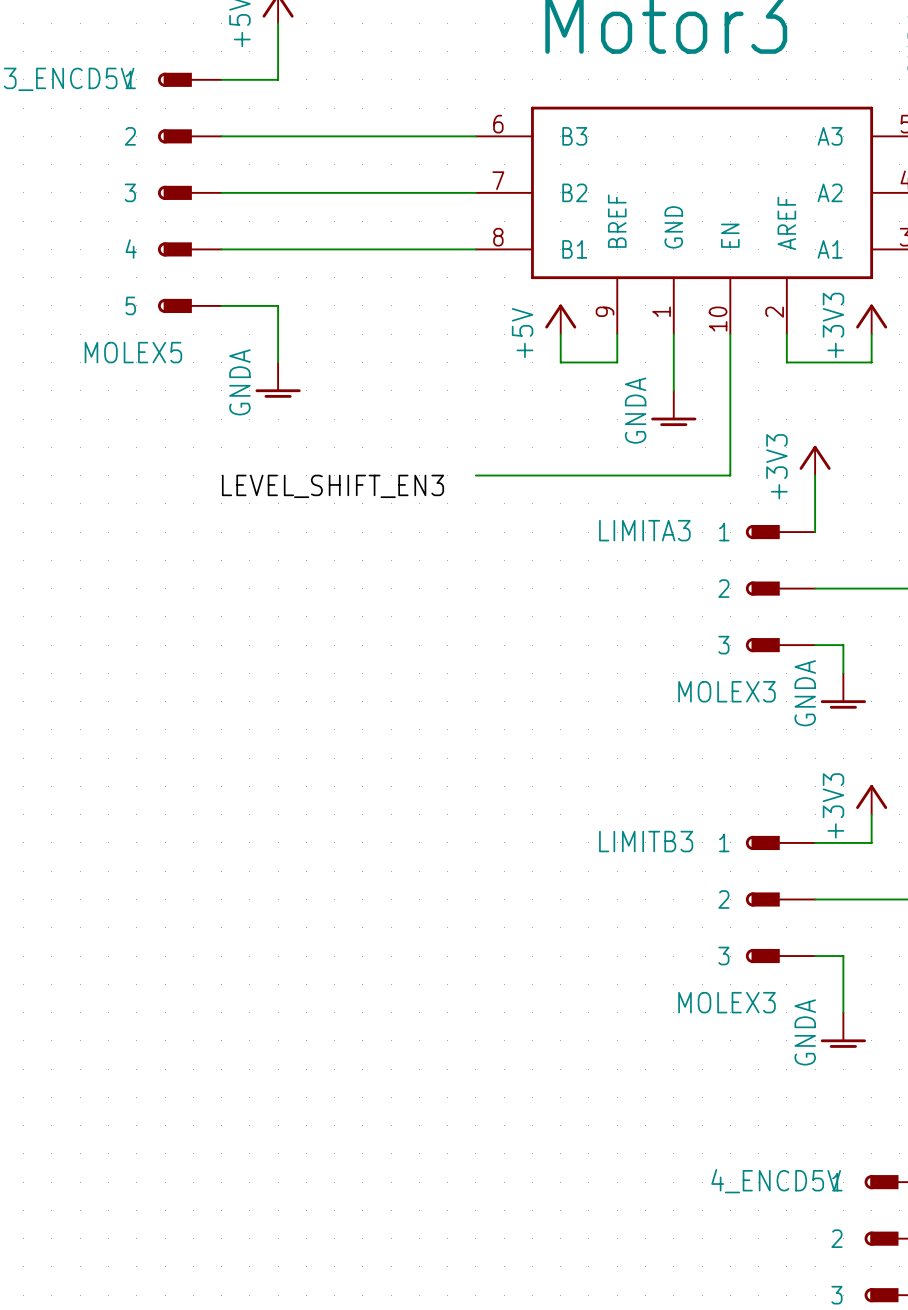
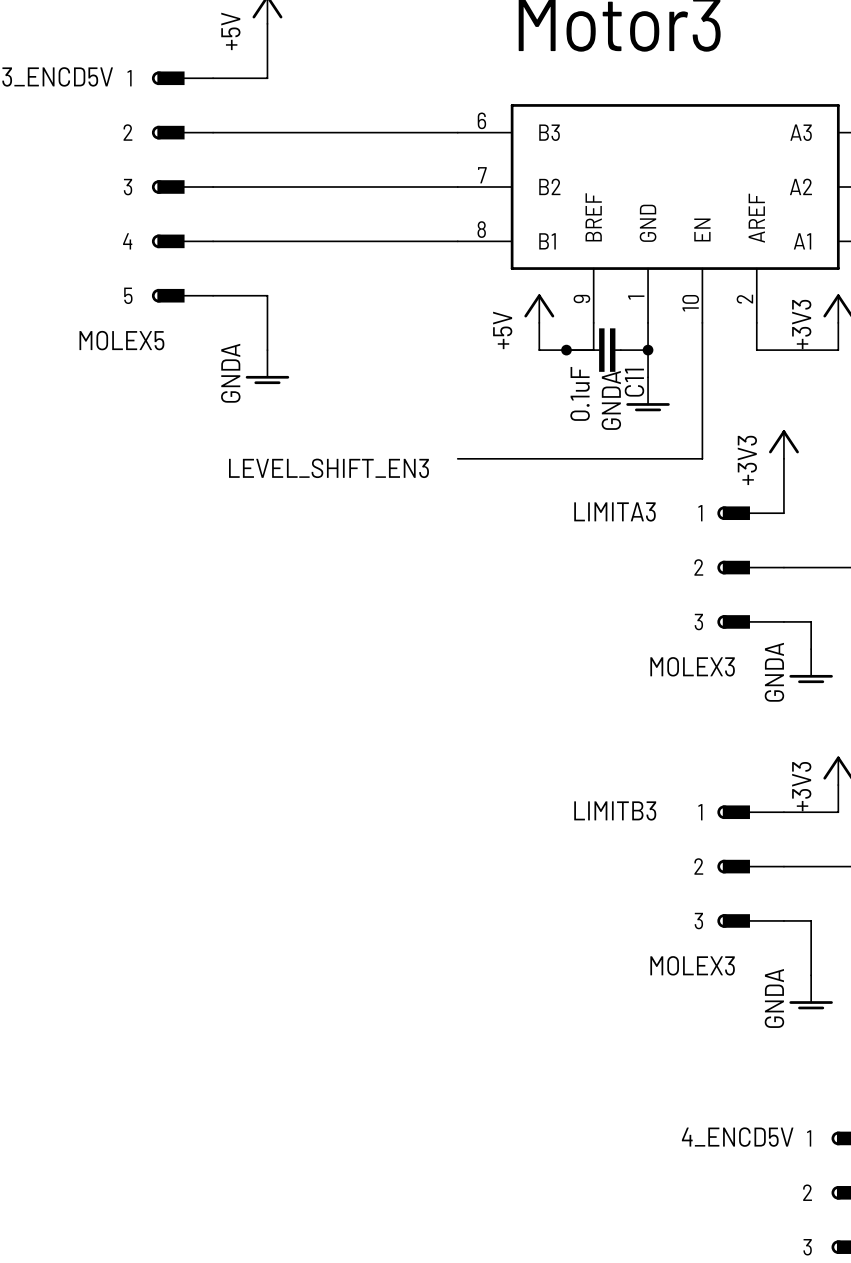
junction: none -> (566, 350)
C11: none -> 0.1uF (607, 350)
junction: none -> (648, 350)

